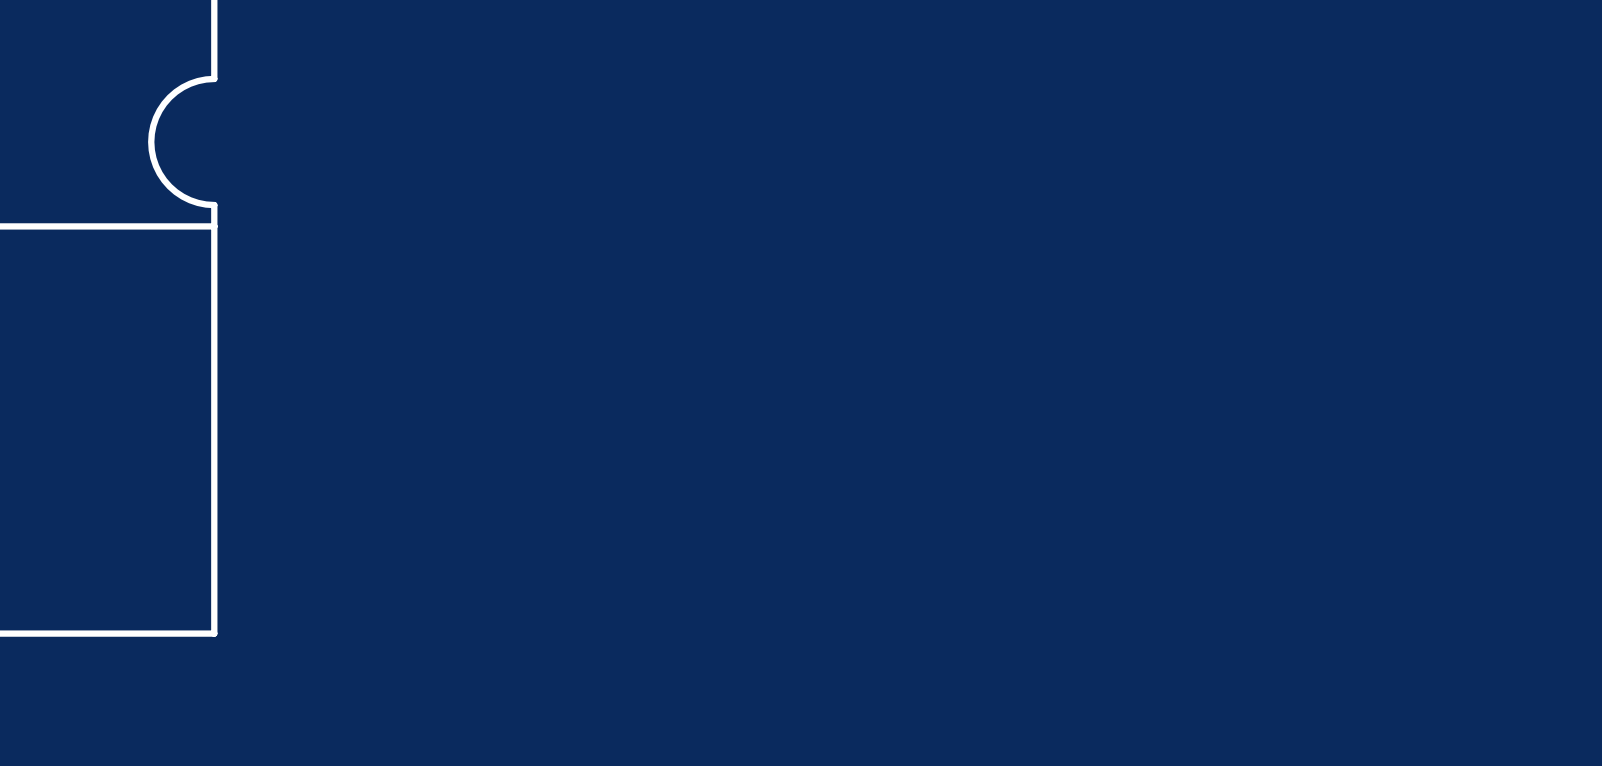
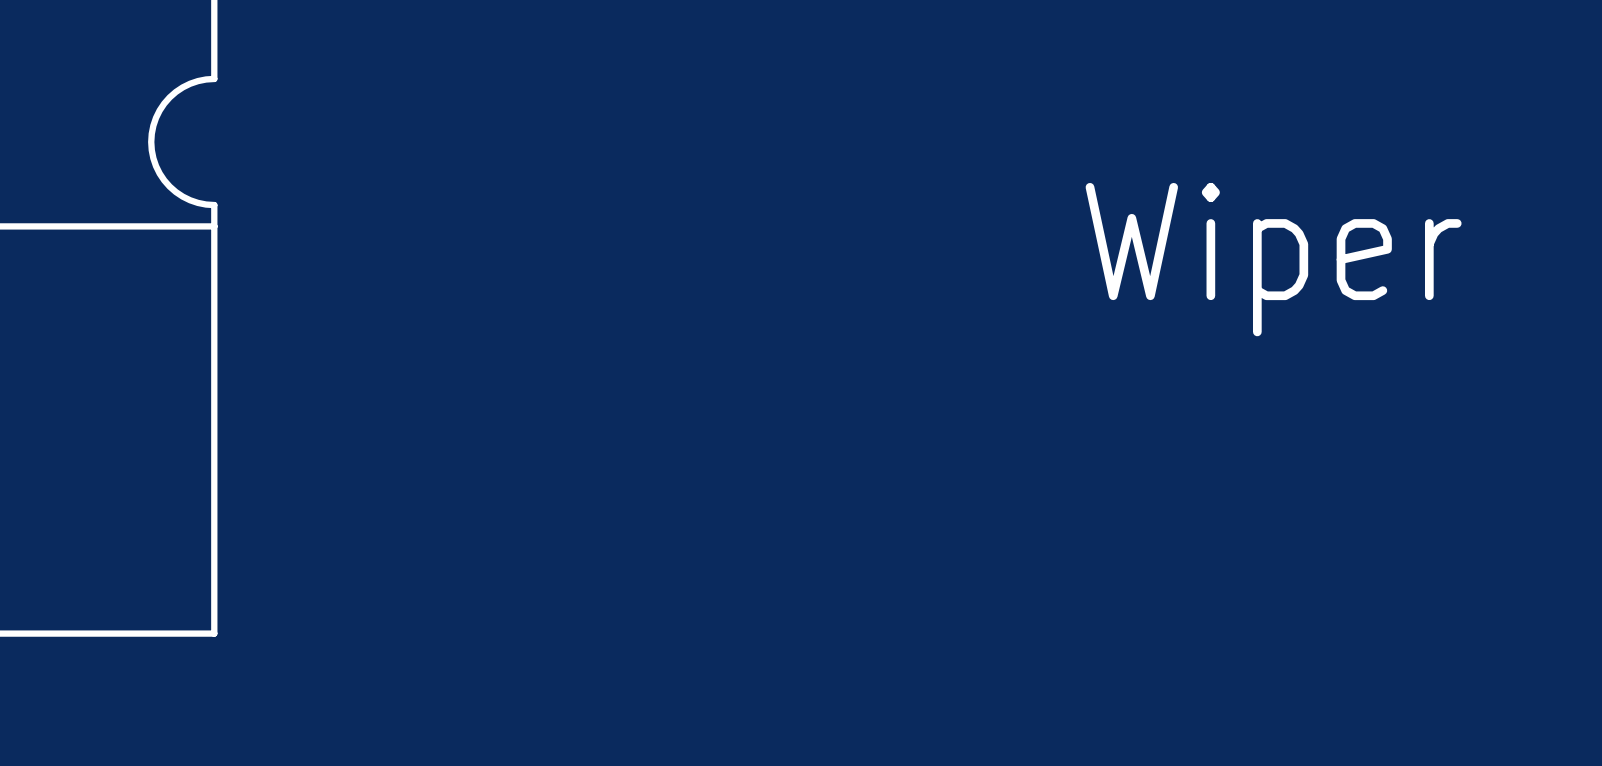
text: none -> Wiper (1273, 259)

